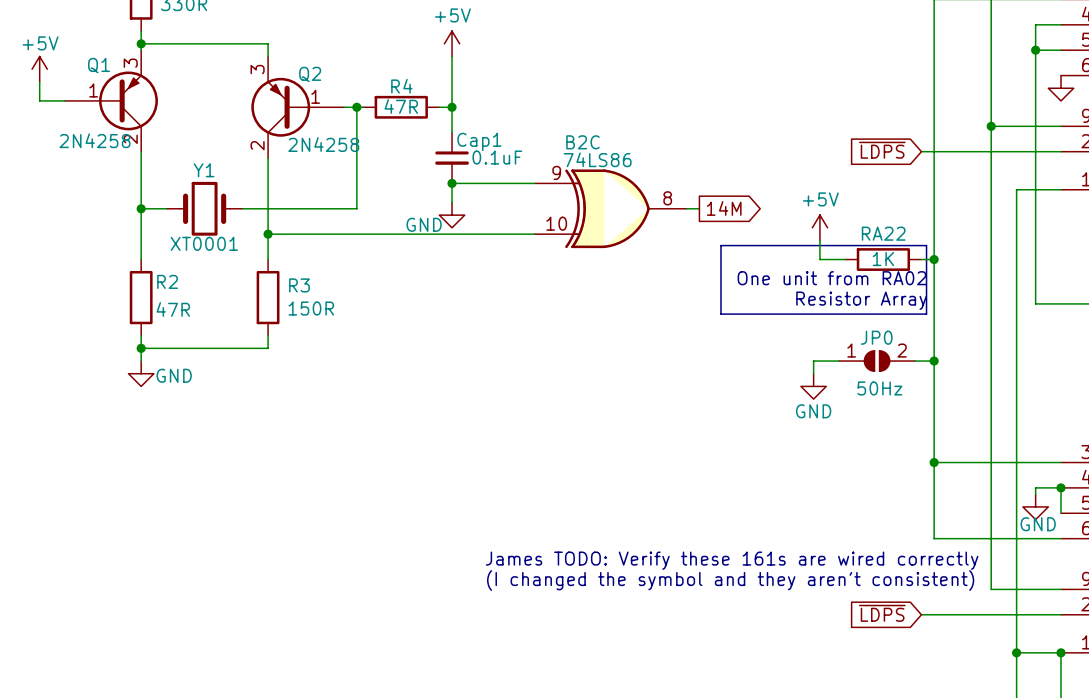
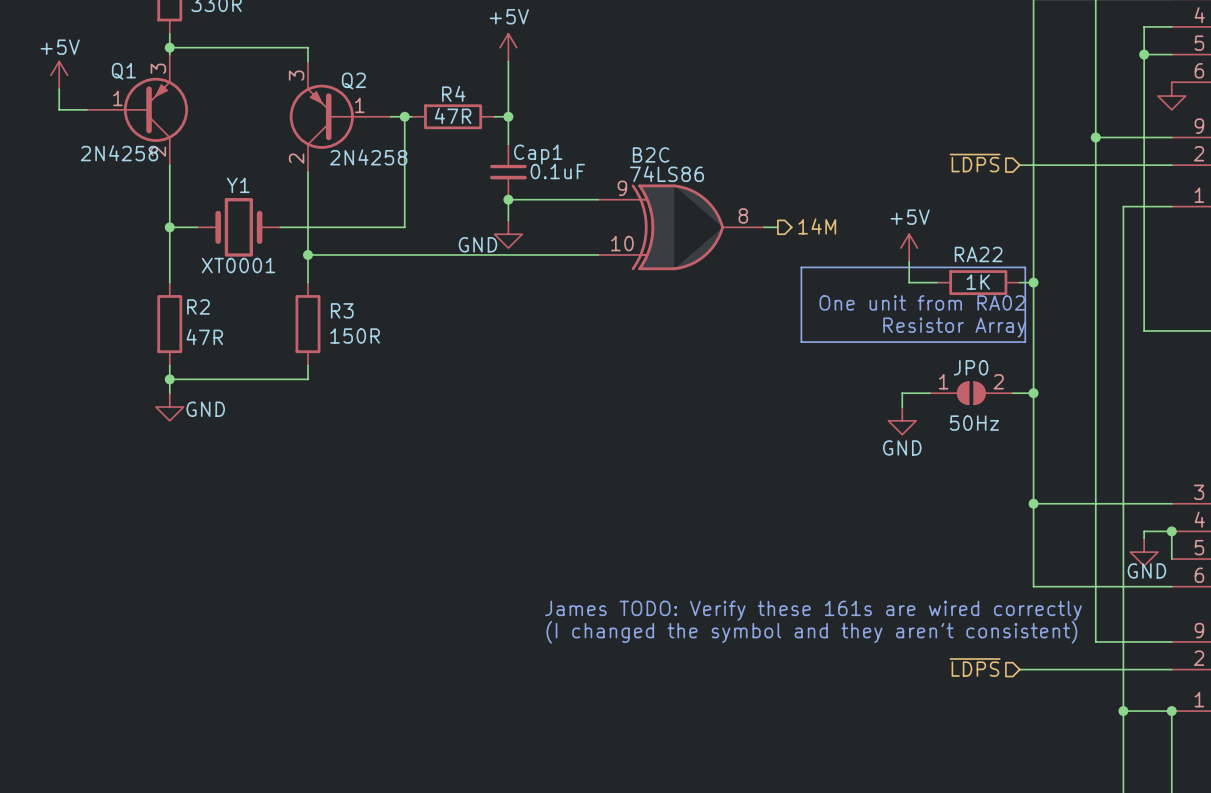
hierarchical label: none -> ~{LDPS} (975, 163)
global label: ~{LDPS} (882, 150) -> none
global label: 14M (724, 208) -> none
hierarchical label: none -> 14M (817, 226)
hierarchical label: none -> ~{LDPS} (975, 667)
global label: ~{LDPS} (882, 613) -> none

